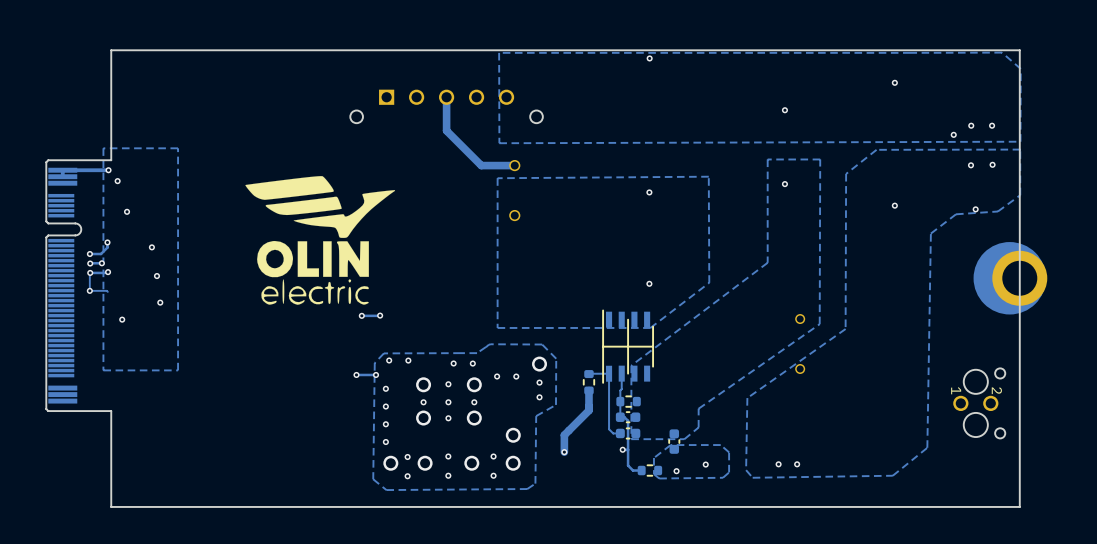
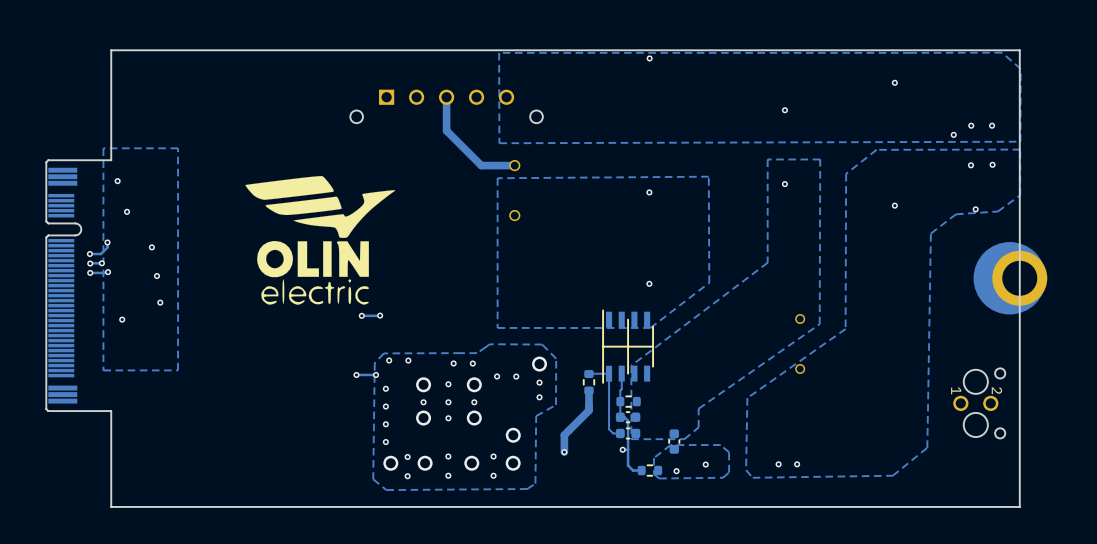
track: (108, 170) (62, 170) (62, 176) -> none
via: (108, 170) -> none
track: (90, 272) (89, 290) (107, 291) -> none
via: (89, 290) -> none

